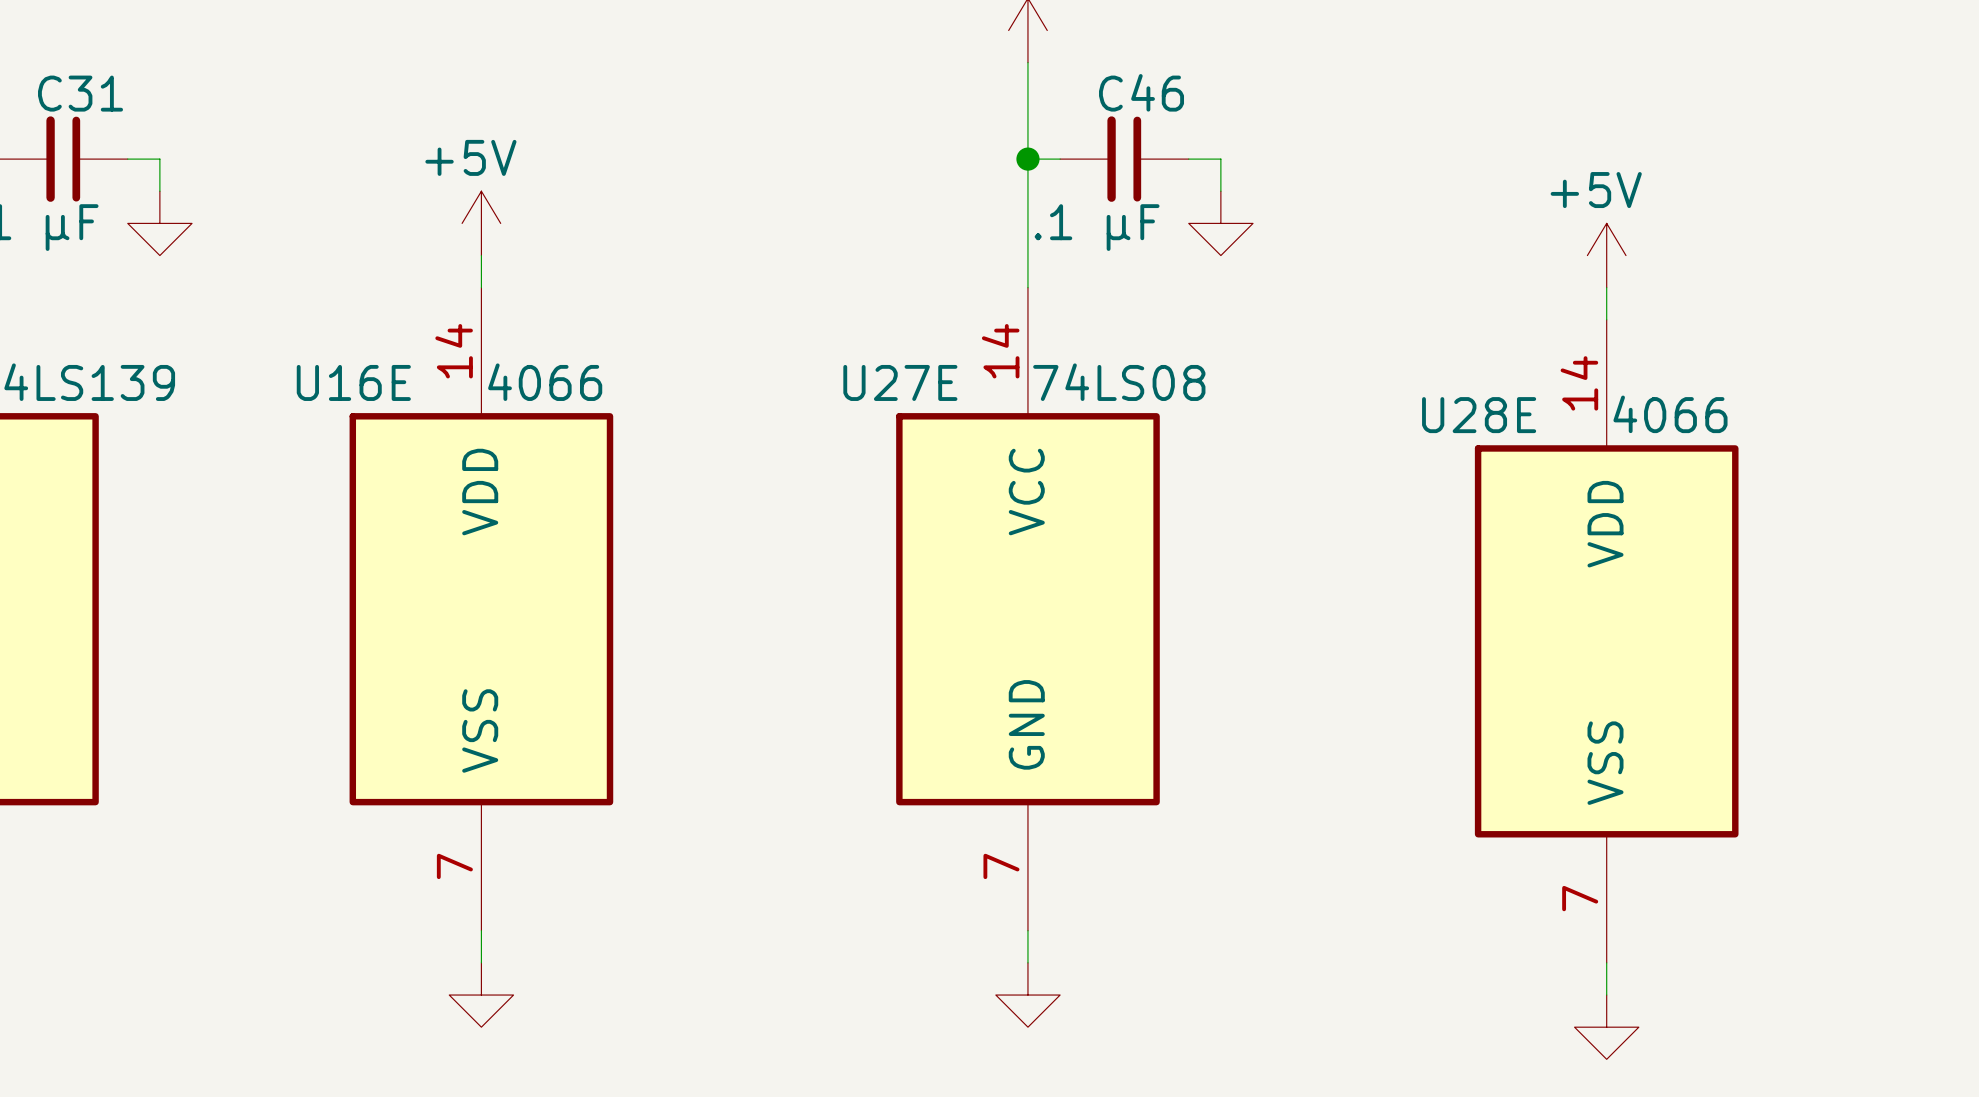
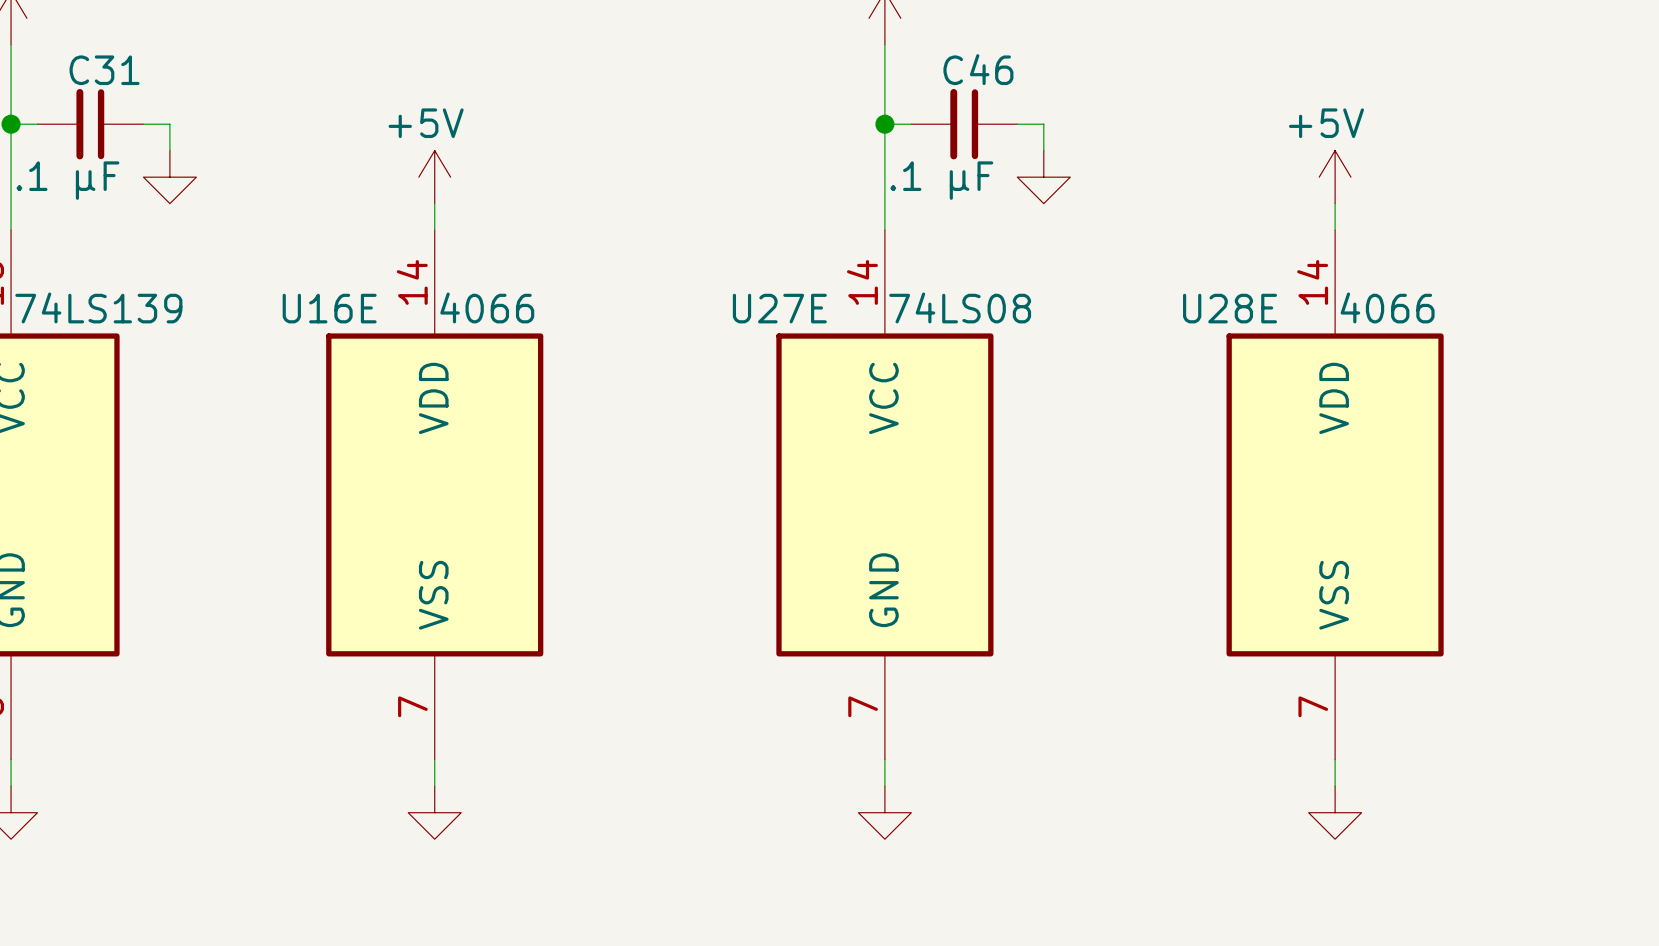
power symbol position: +5V (1606, 255) -> +5V (1335, 177)
wire: (1606, 287) (1606, 319) -> (1335, 203) (1335, 230)
U28E position: (1606, 641) -> (1335, 494)
wire: (1606, 962) (1606, 995) -> (1335, 759) (1335, 786)
power symbol position: (1606, 1027) -> (1335, 812)

